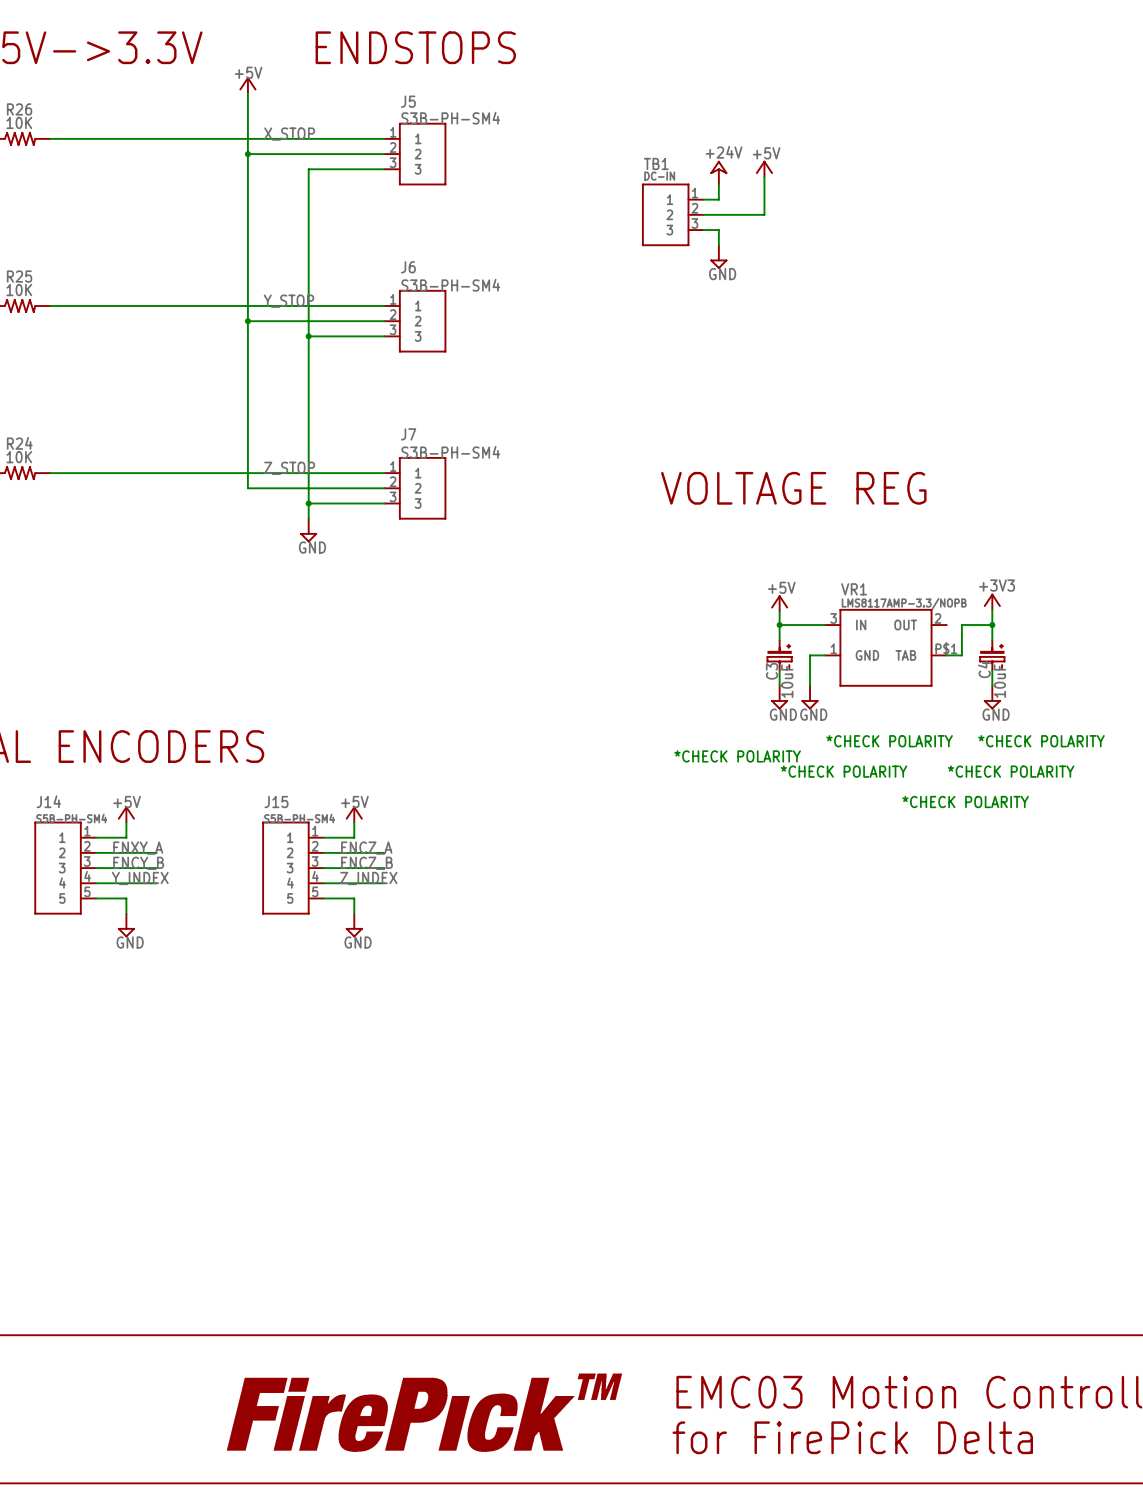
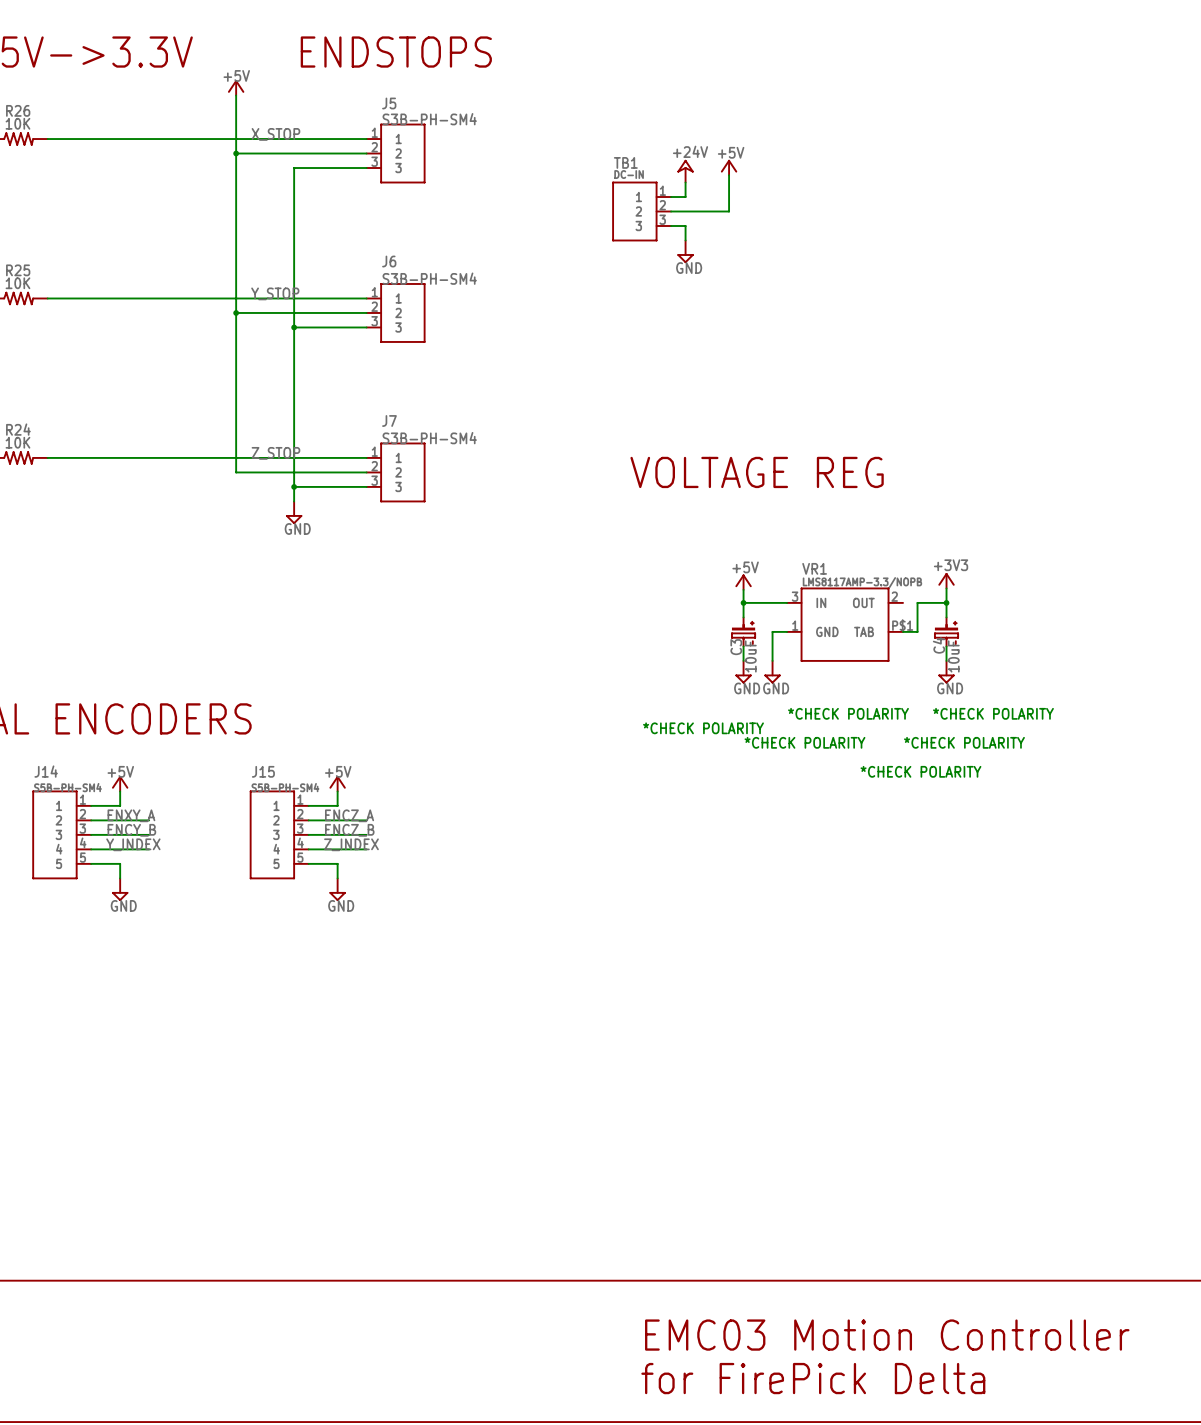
part: (424, 1412) -> none

